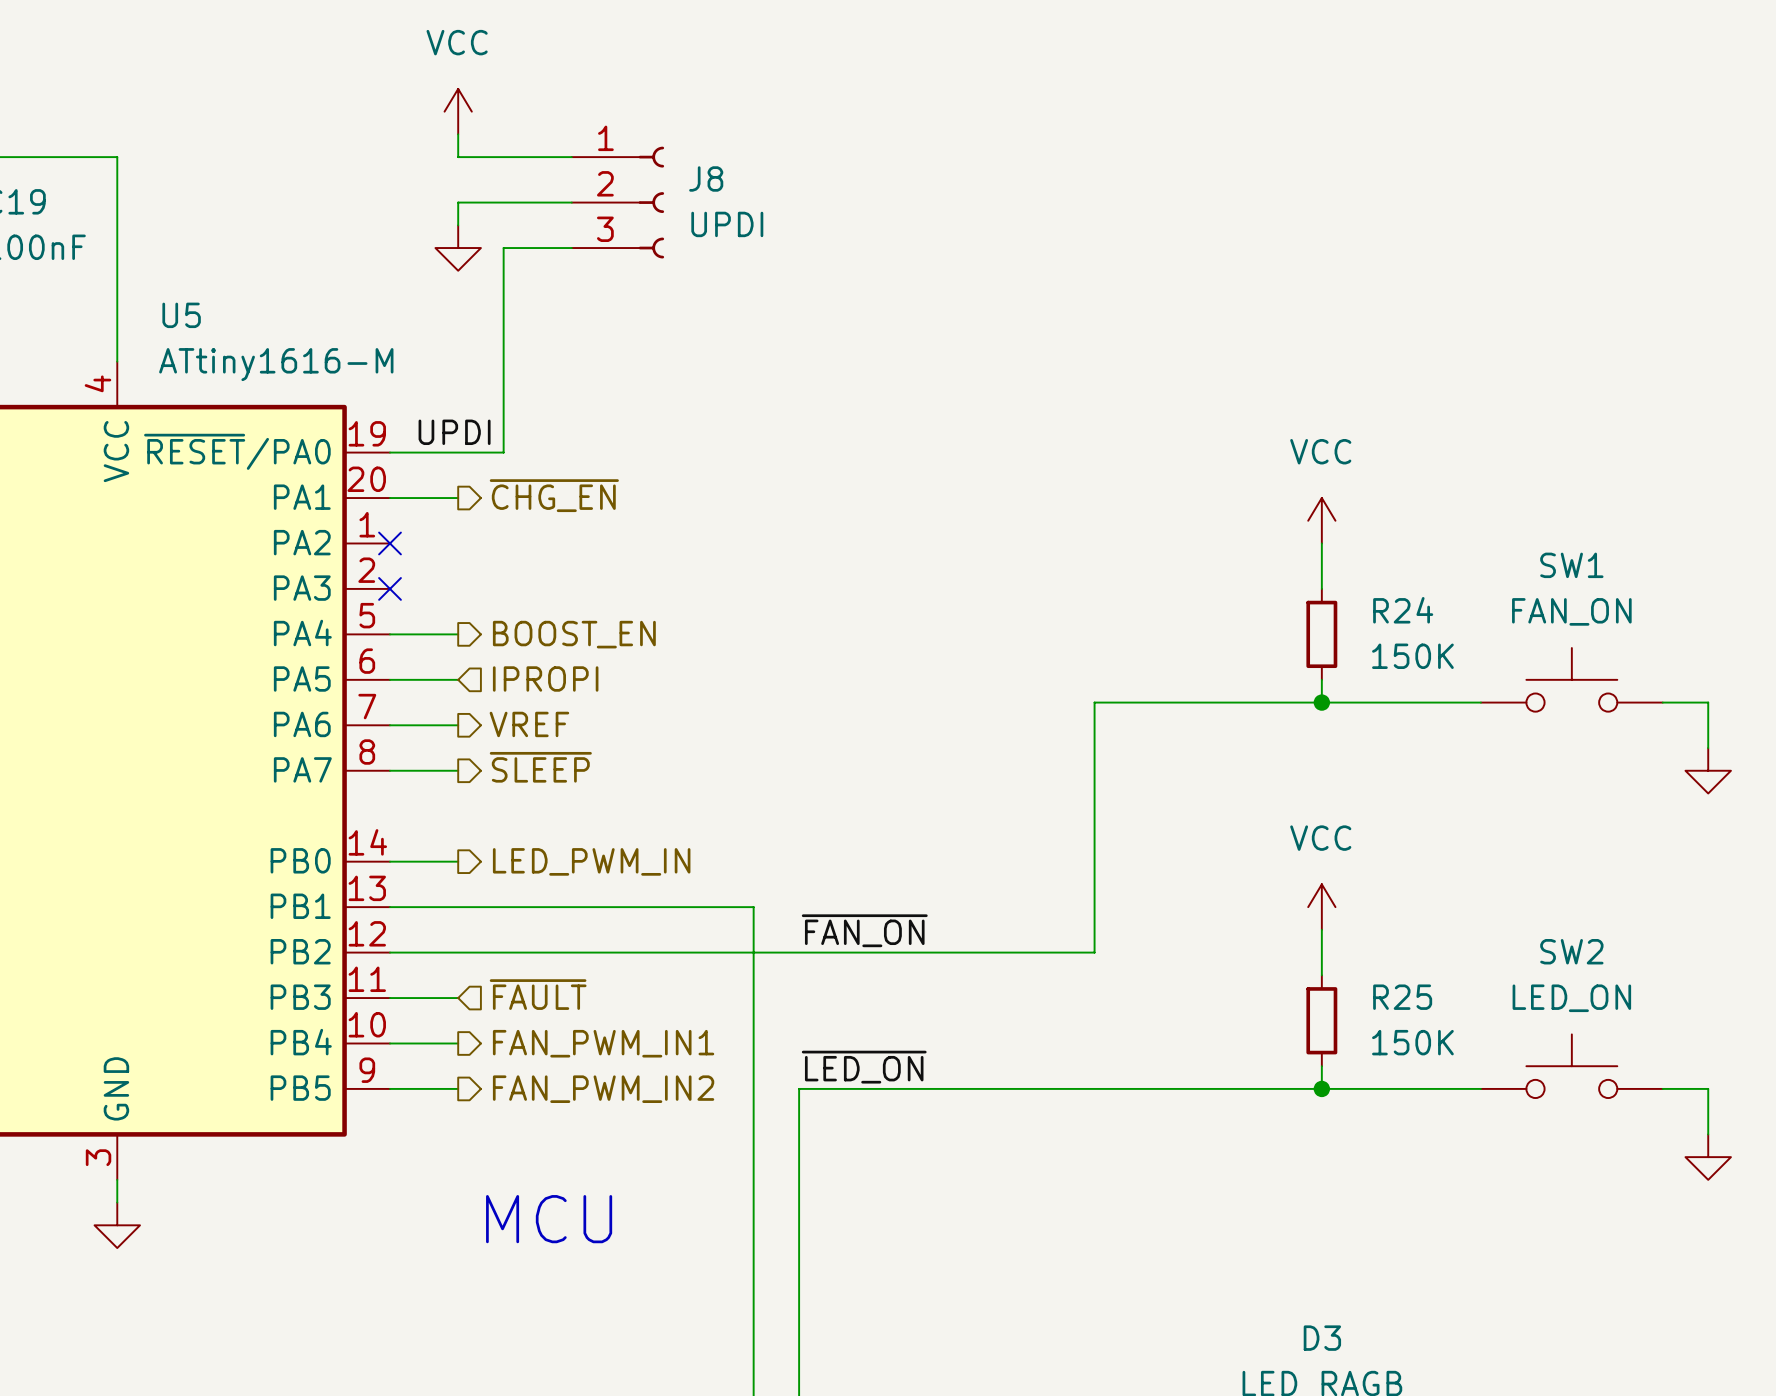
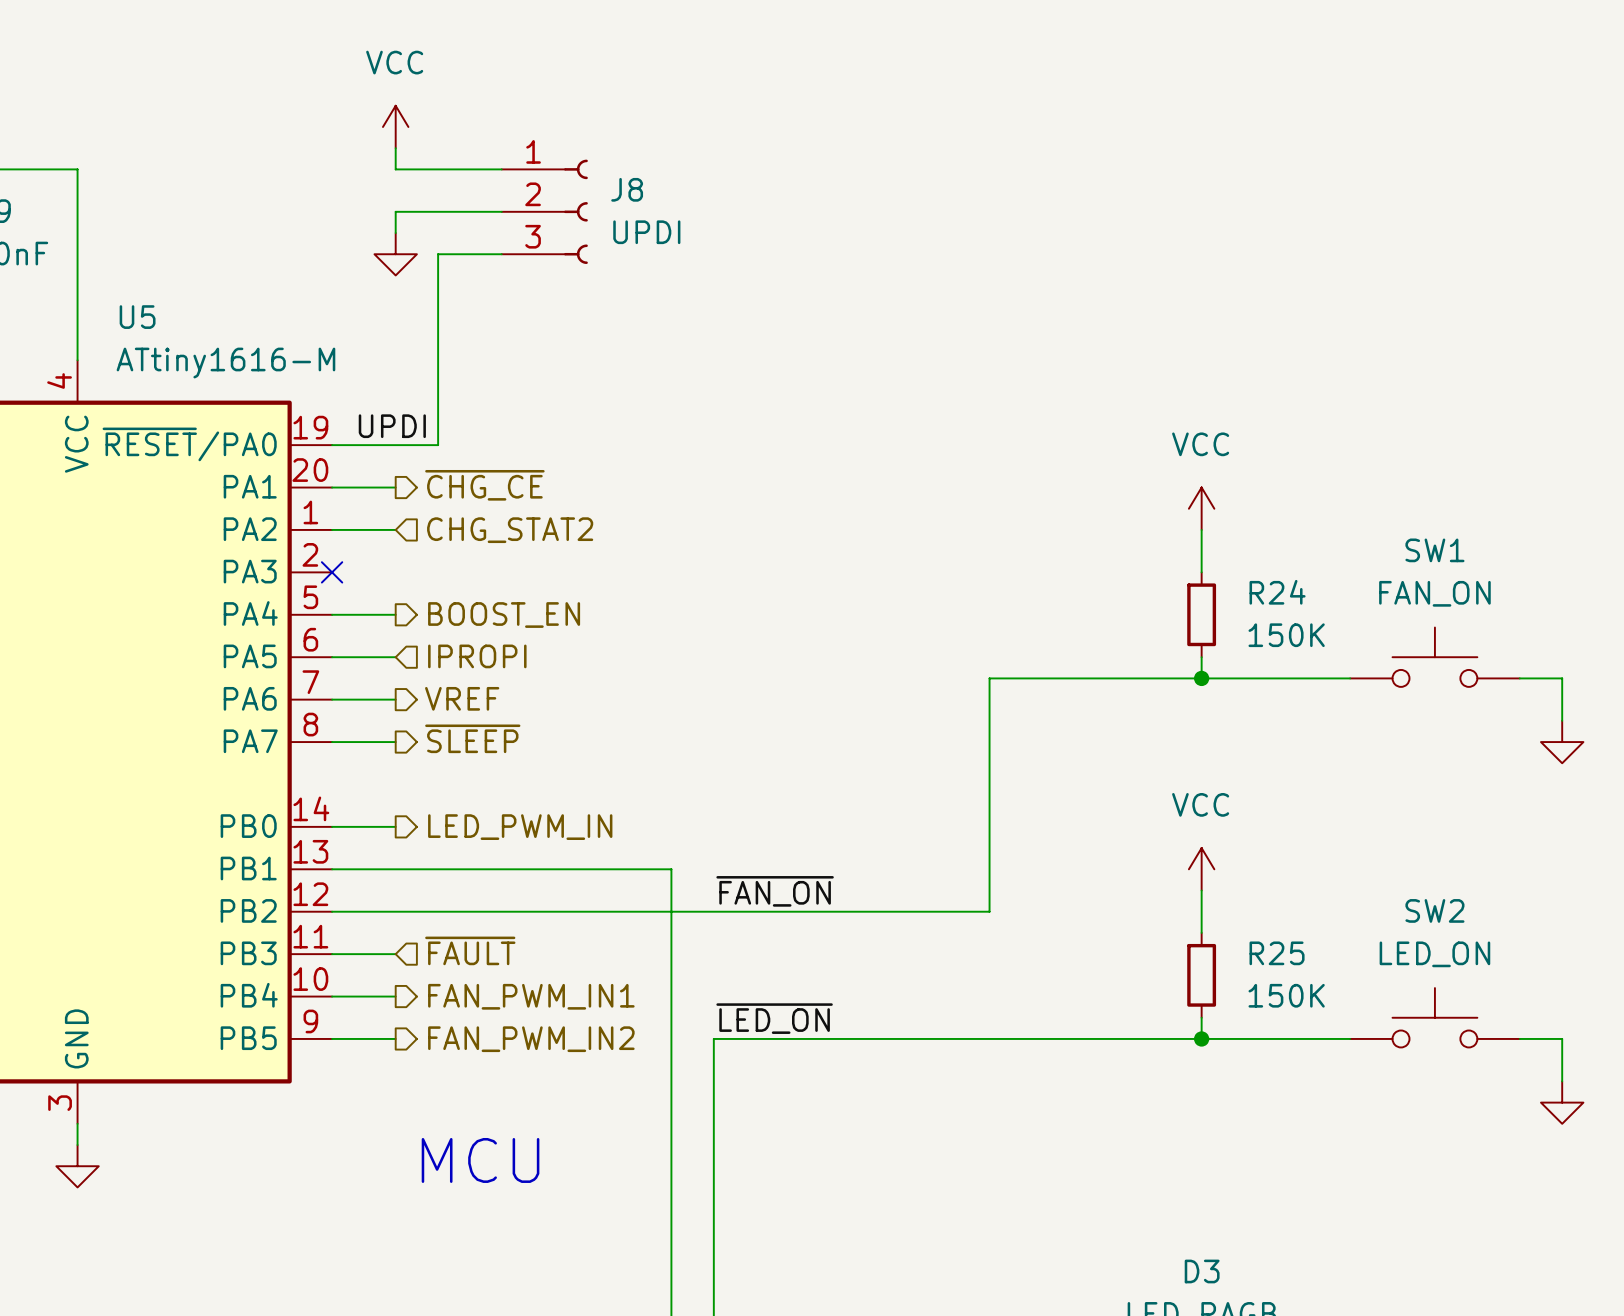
hierarchical label: ~{CHG_EN} (554, 495) -> ~{CHG_CE} (484, 485)
wire: none -> (332, 529) (395, 529)
no-connect mark: (390, 543) -> none
hierarchical label: none -> CHG_STAT2 (510, 530)

